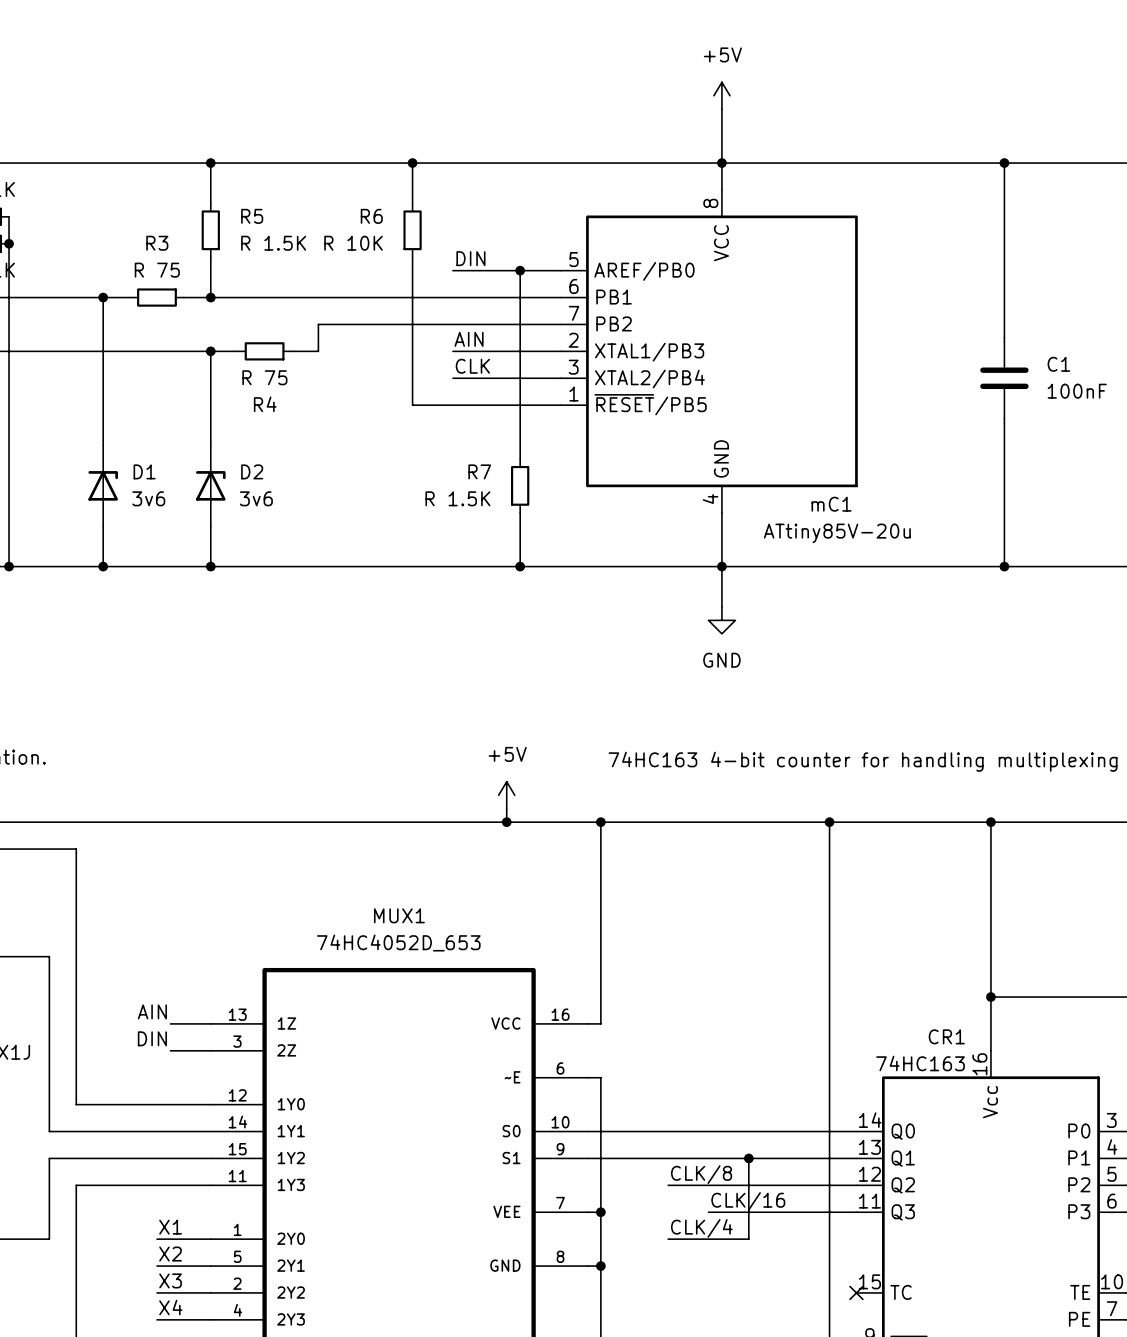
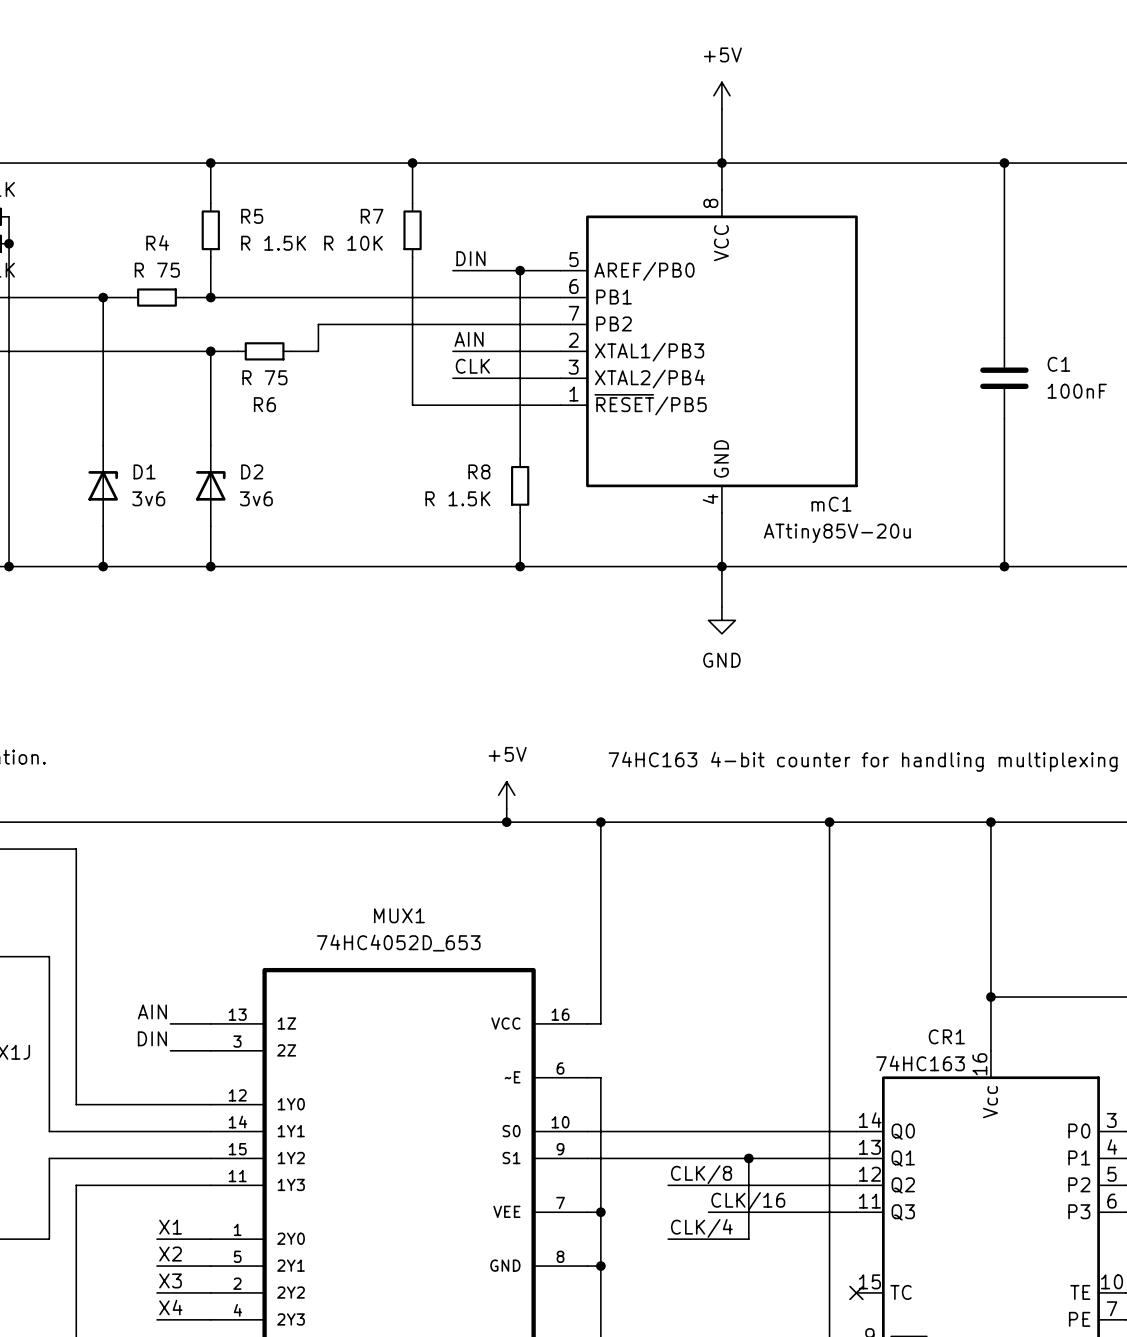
R6 name: R6 (371, 216) -> R7 (372, 216)
R3 name: R3 (157, 243) -> R4 (157, 242)
R4 name: R4 (265, 404) -> R6 (264, 404)
R7 name: R7 (479, 471) -> R8 (479, 471)

